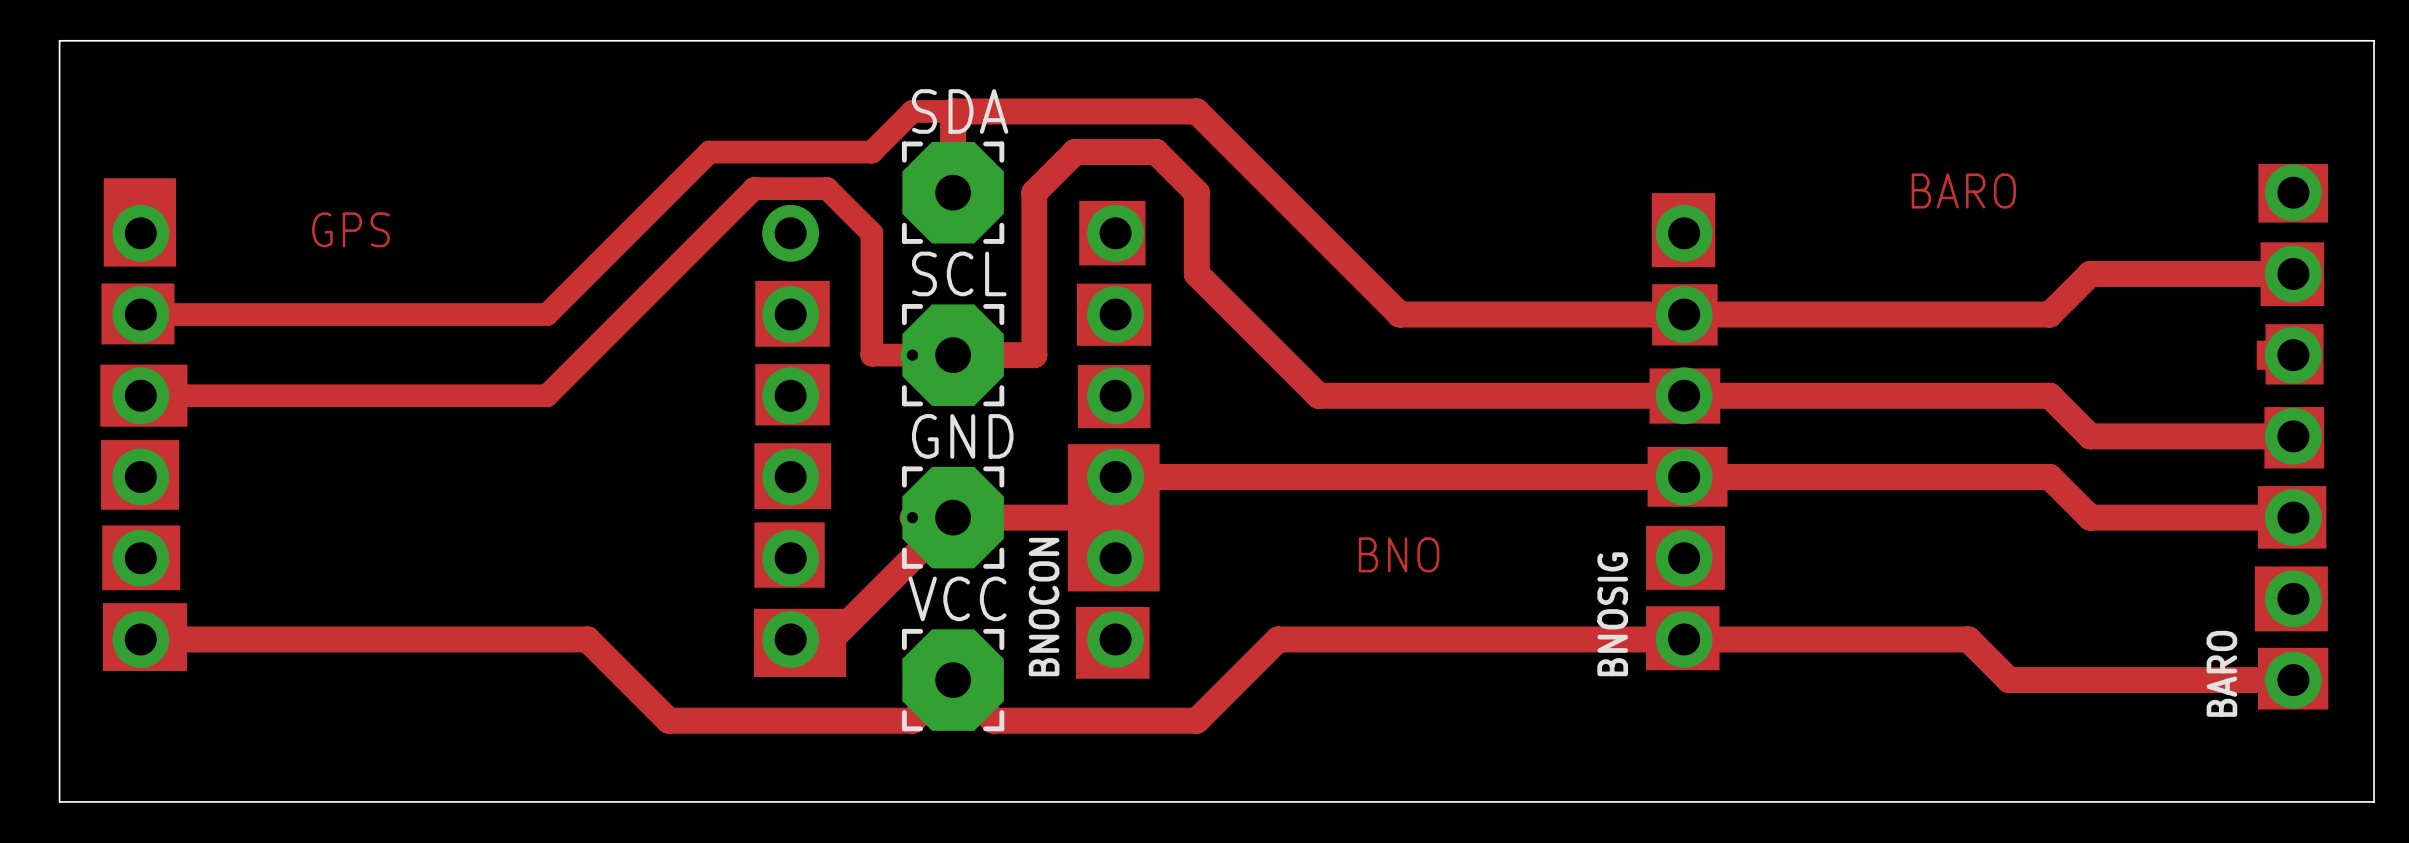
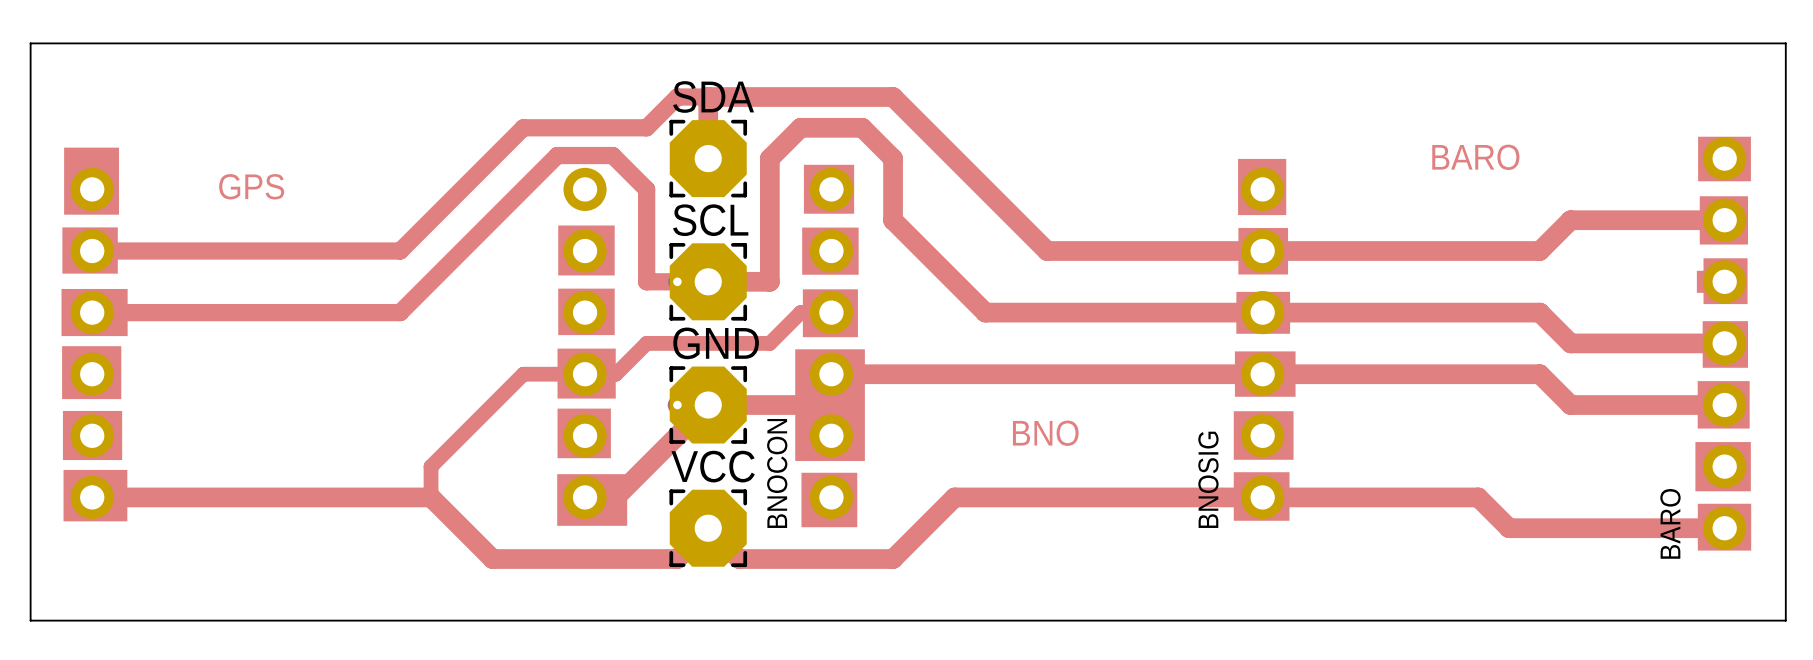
track: none -> (831, 312) (800, 312) (769, 343) (646, 343) (615, 374) (523, 374) (431, 466) (431, 497)

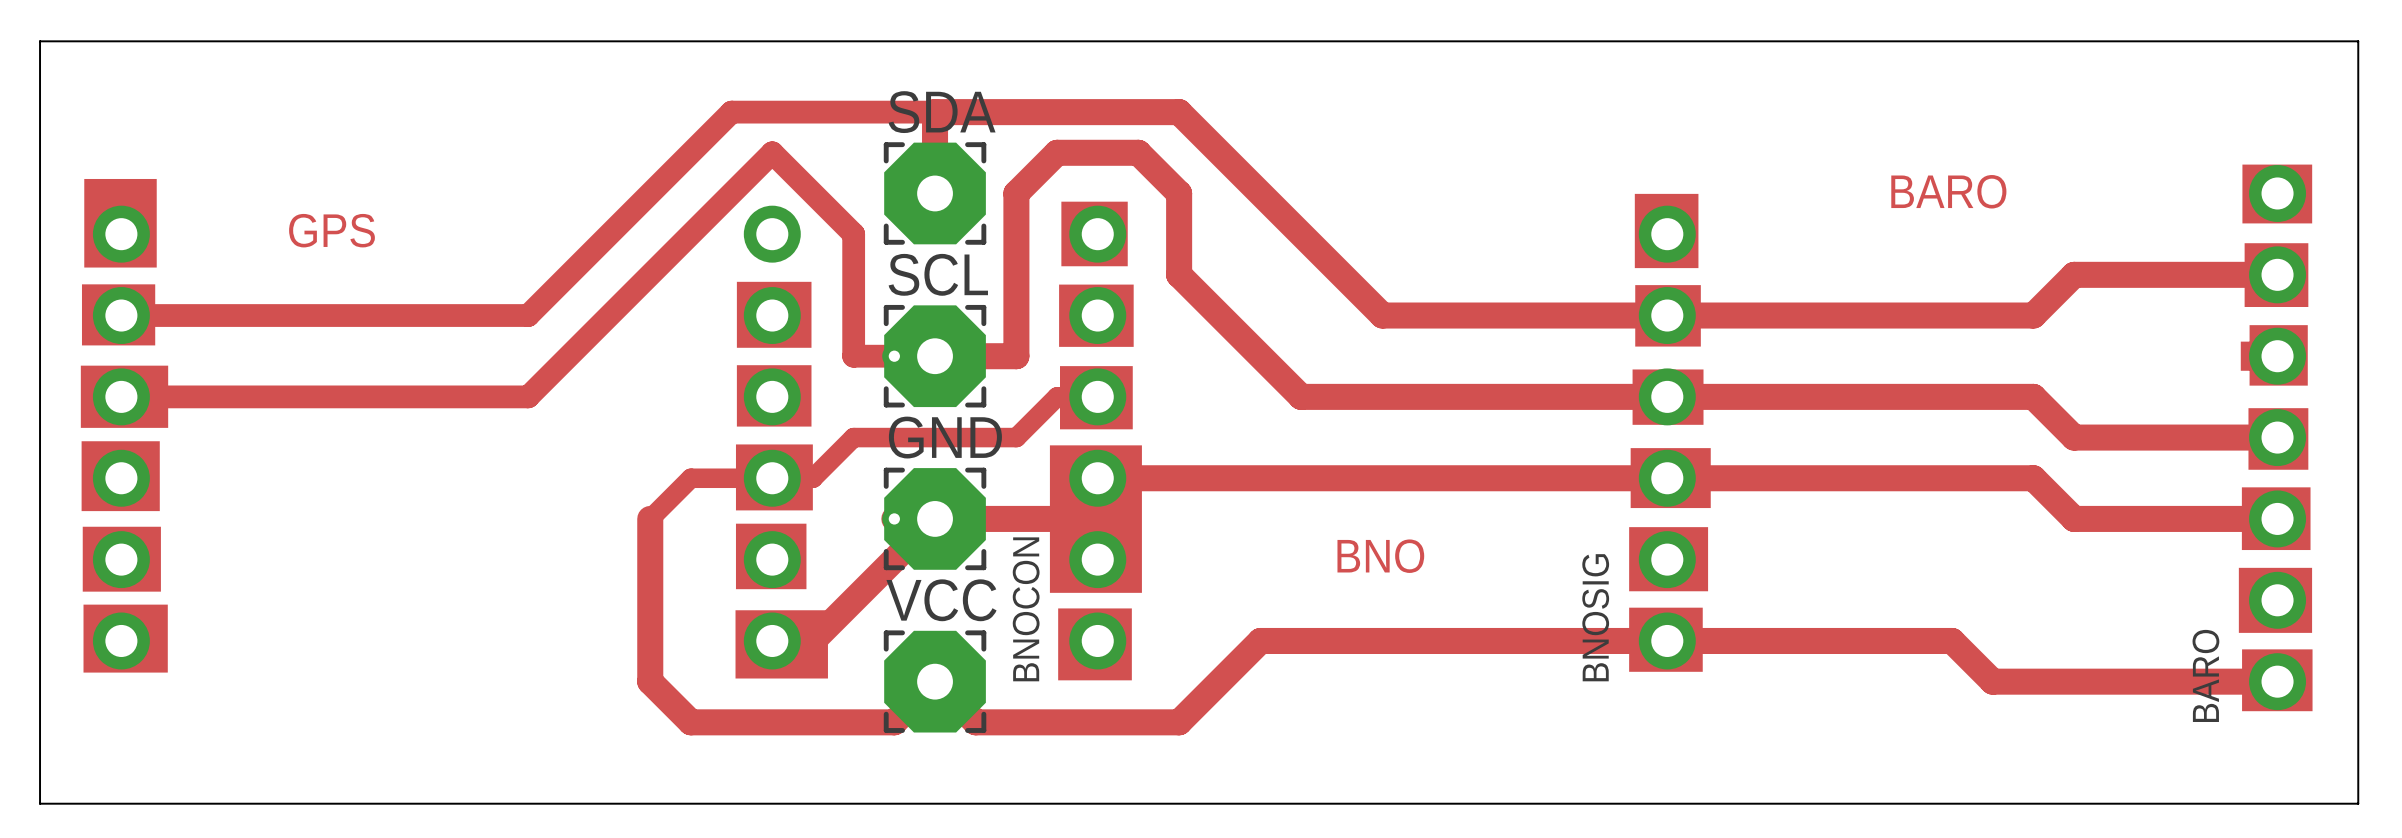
track: (677, 97) (646, 127) (523, 127) -> (894, 112) (731, 112) (690, 152)
track: (557, 155) (612, 155) -> (735, 189) (772, 152) (808, 189)
track: (492, 405) (431, 466) (431, 497) -> (650, 518) (650, 681) (690, 722)
track: (92, 497) (431, 497) -> none
track: (431, 497) (492, 559) (523, 559) -> none

